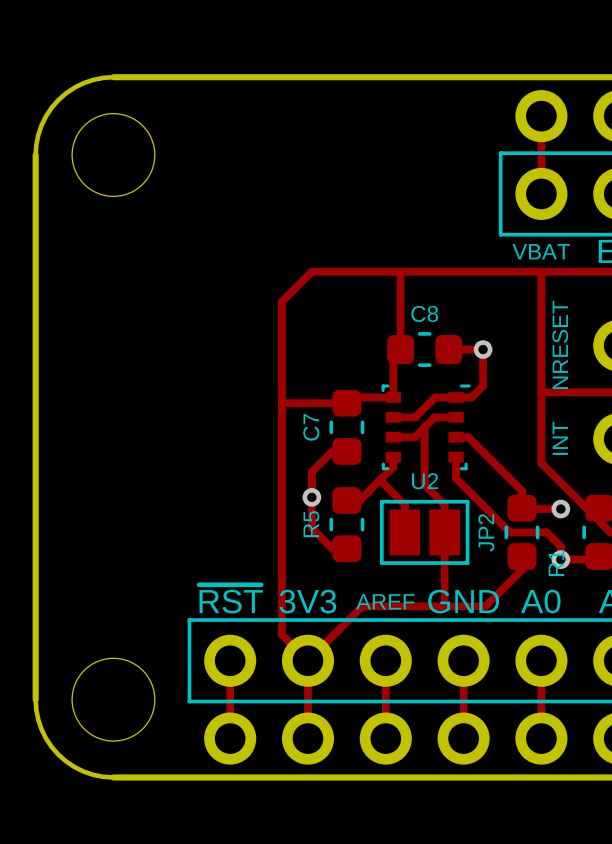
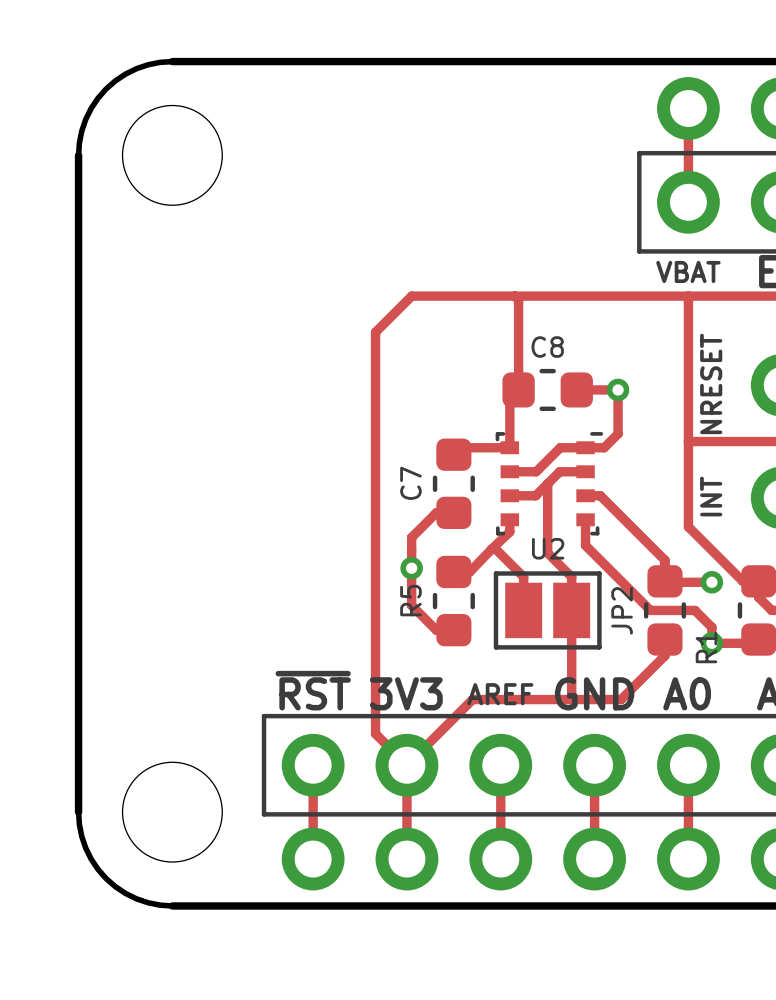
track: (282, 403) (346, 403) -> none

